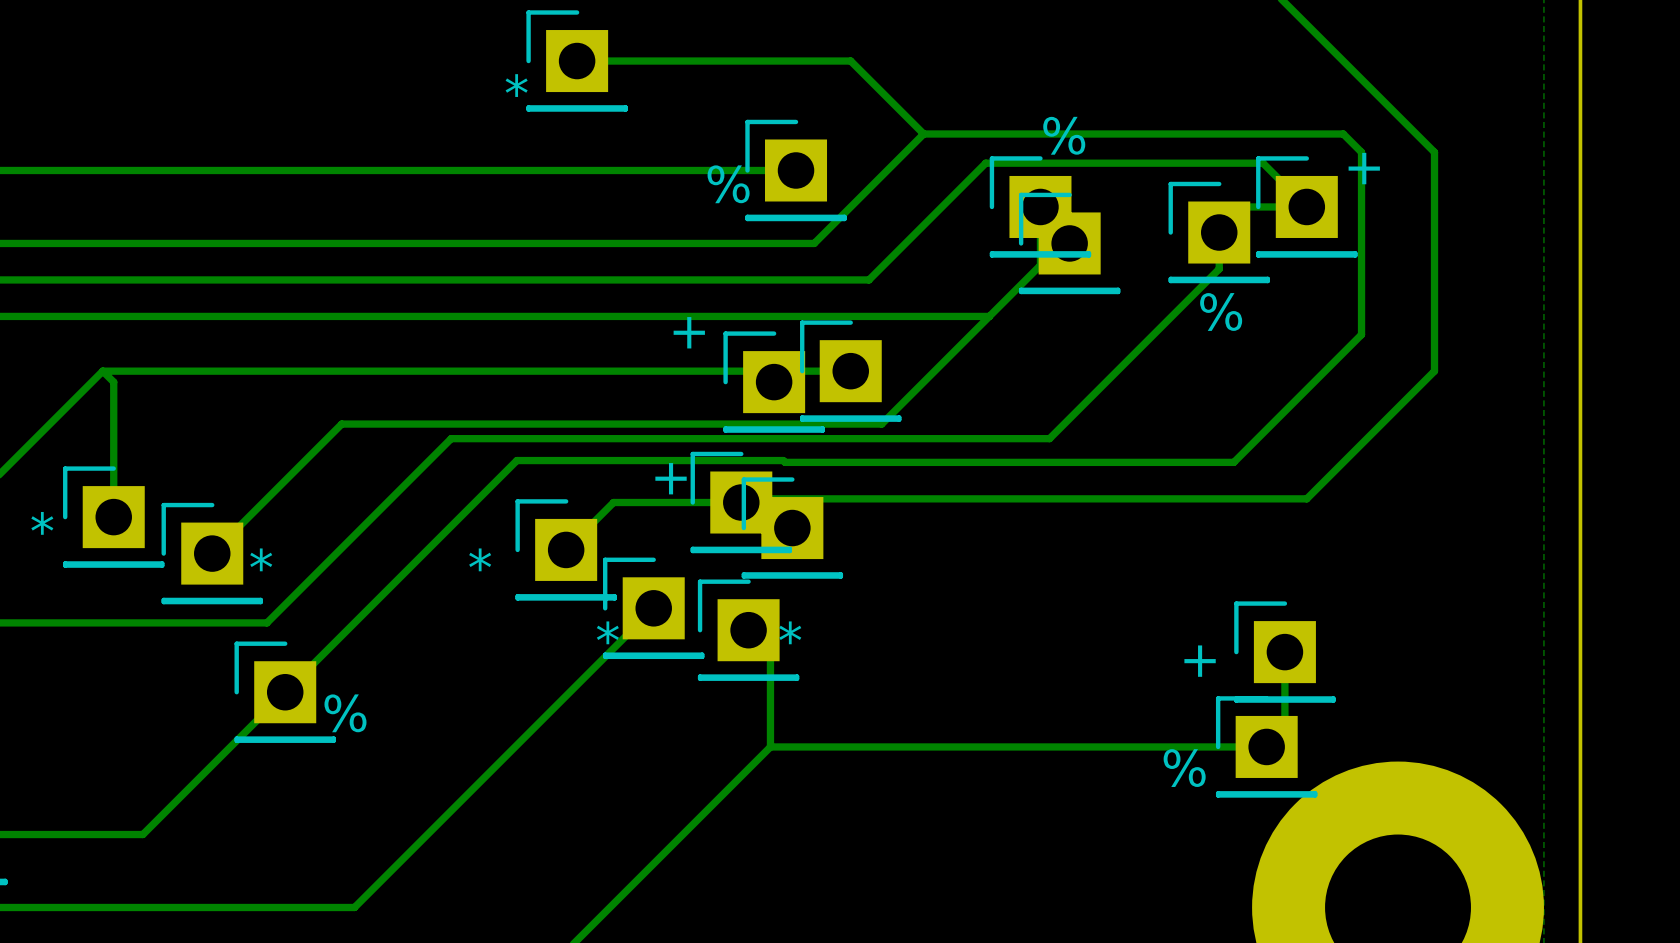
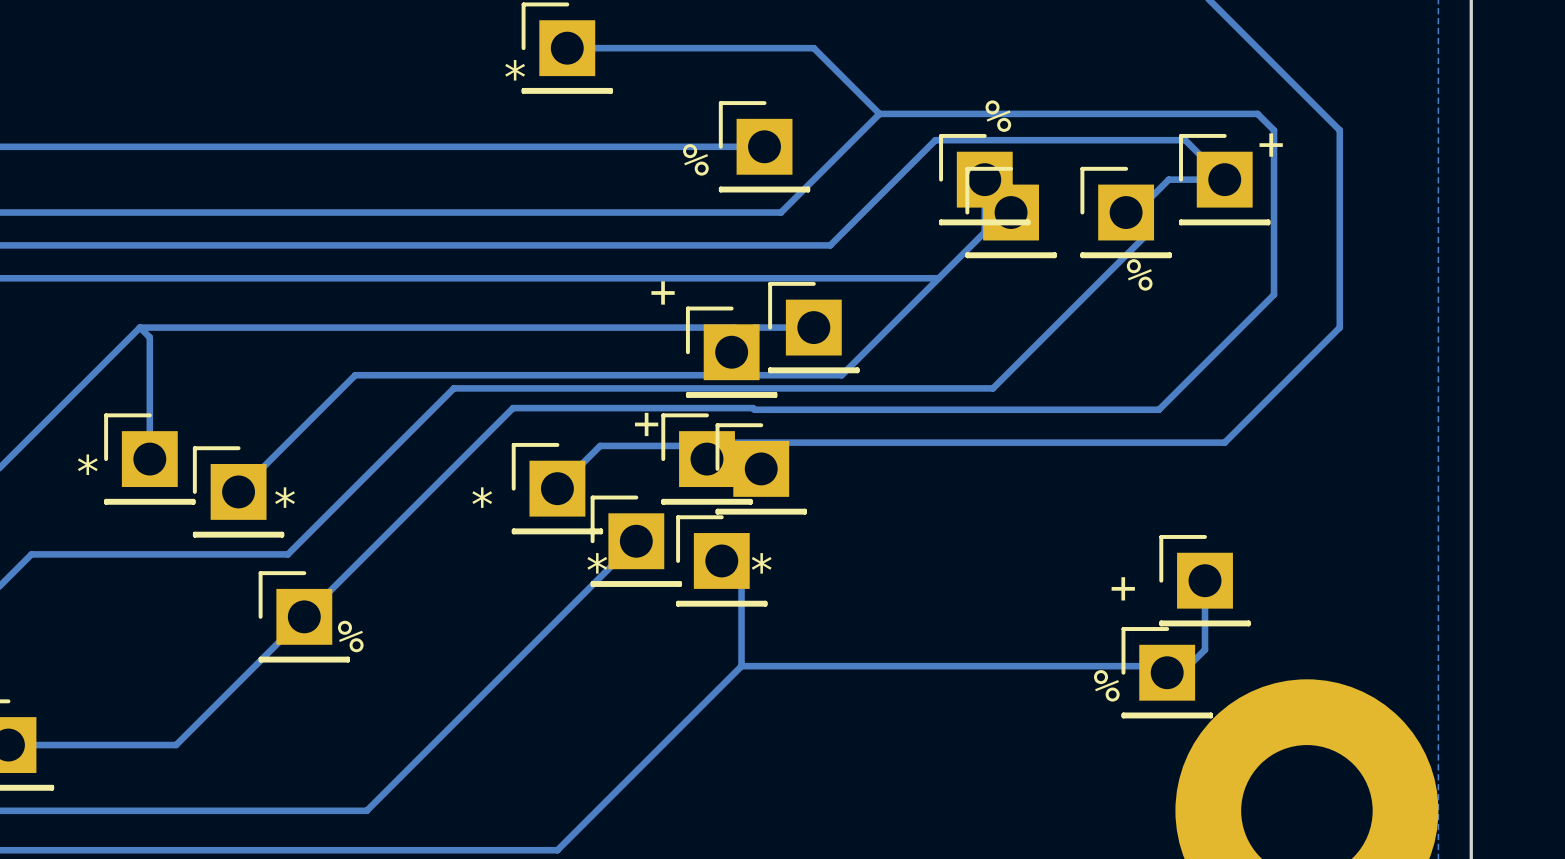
part position: (1219, 232) -> (1126, 212)
part position: (774, 382) -> (731, 352)
part position: (741, 502) -> (707, 459)
part position: (1266, 746) -> (1167, 672)

